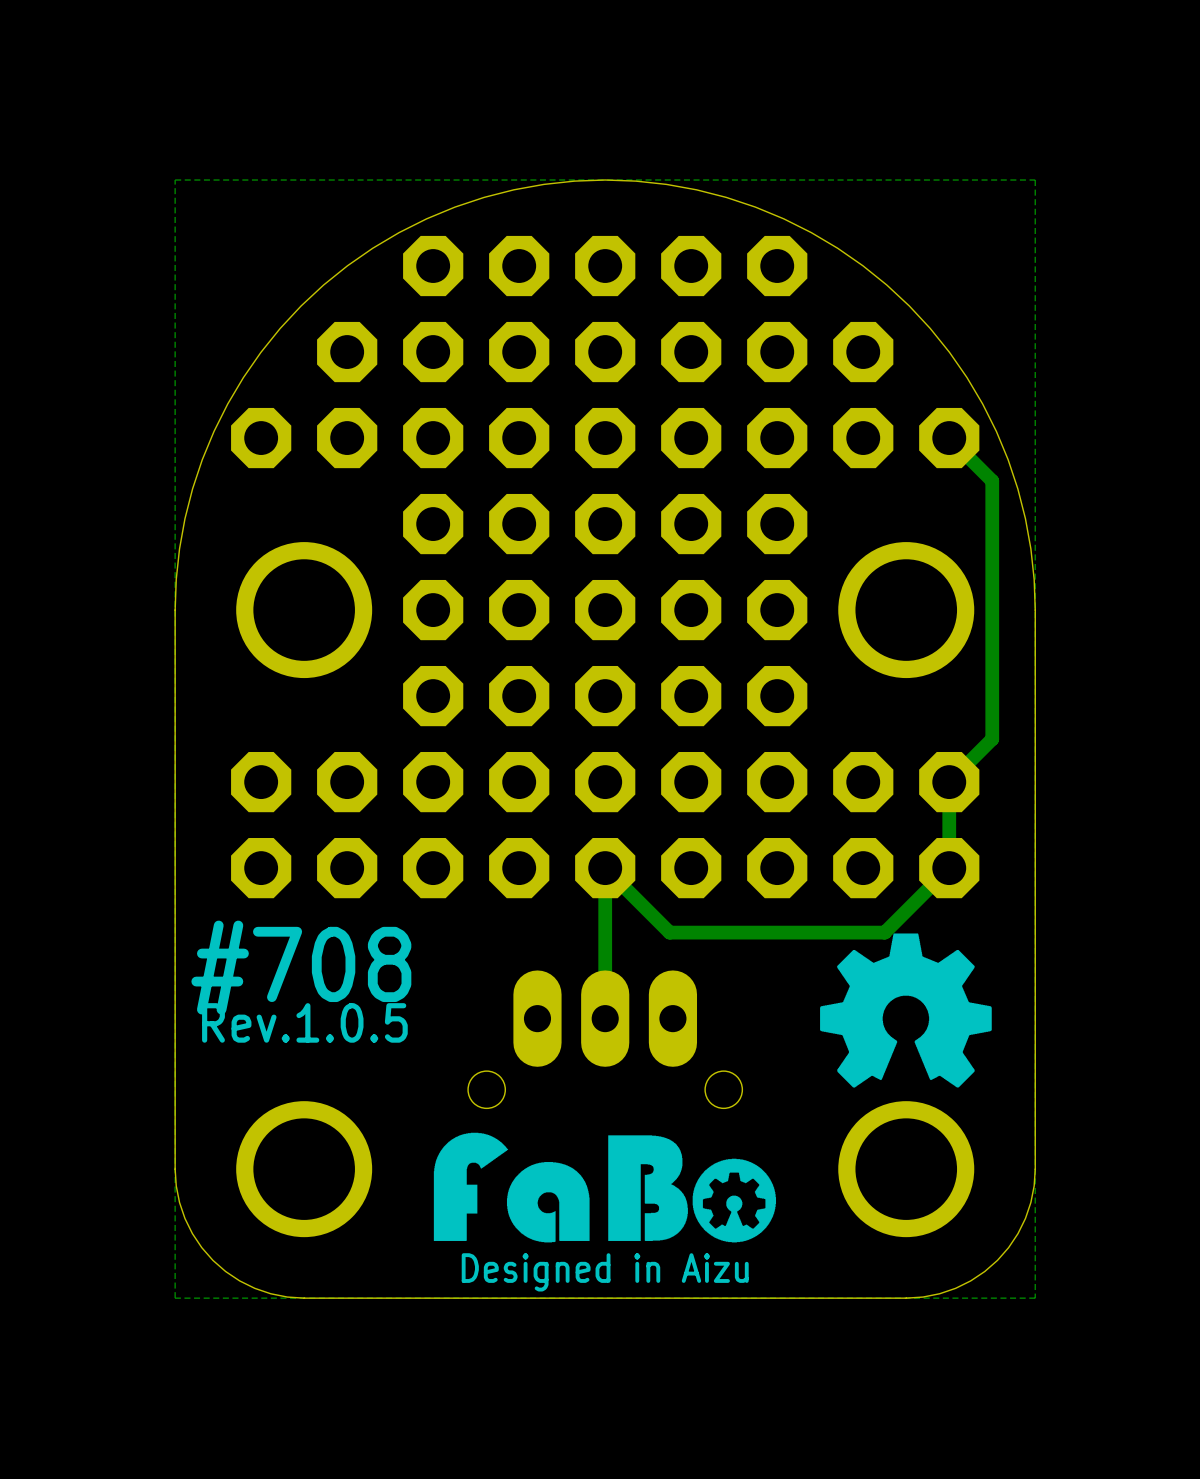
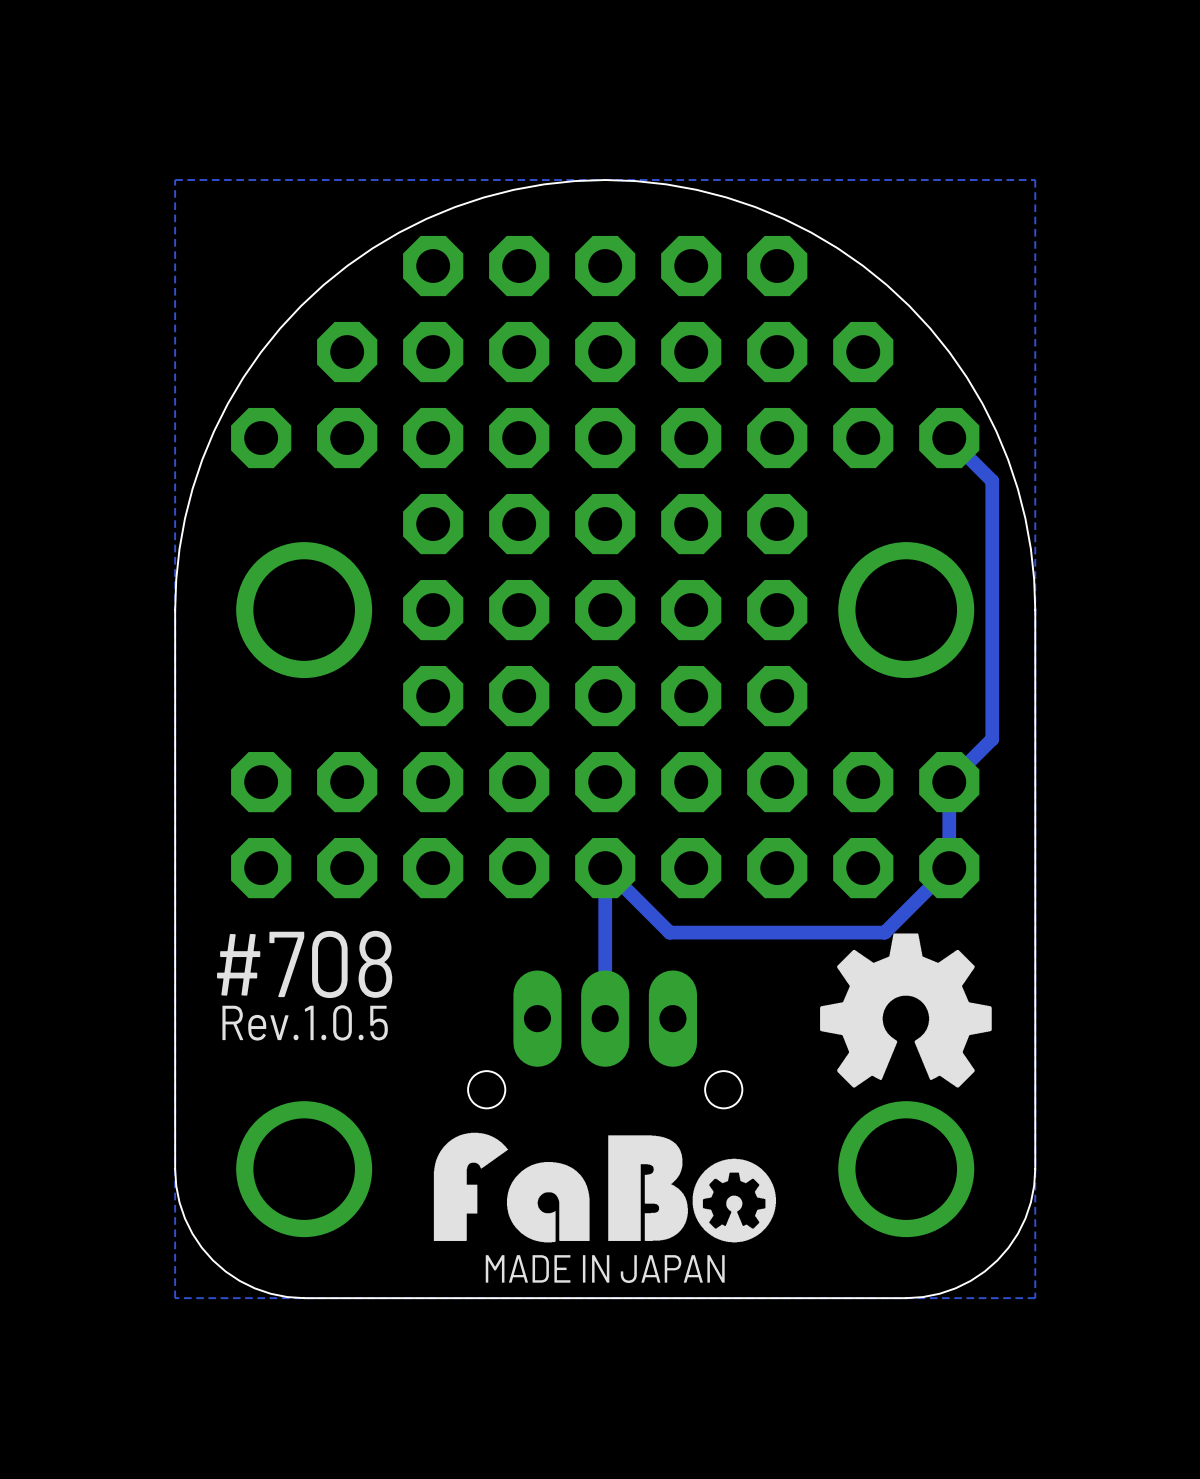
text: Designed in Aizu (605, 1272) -> MADE IN JAPAN (605, 1269)

